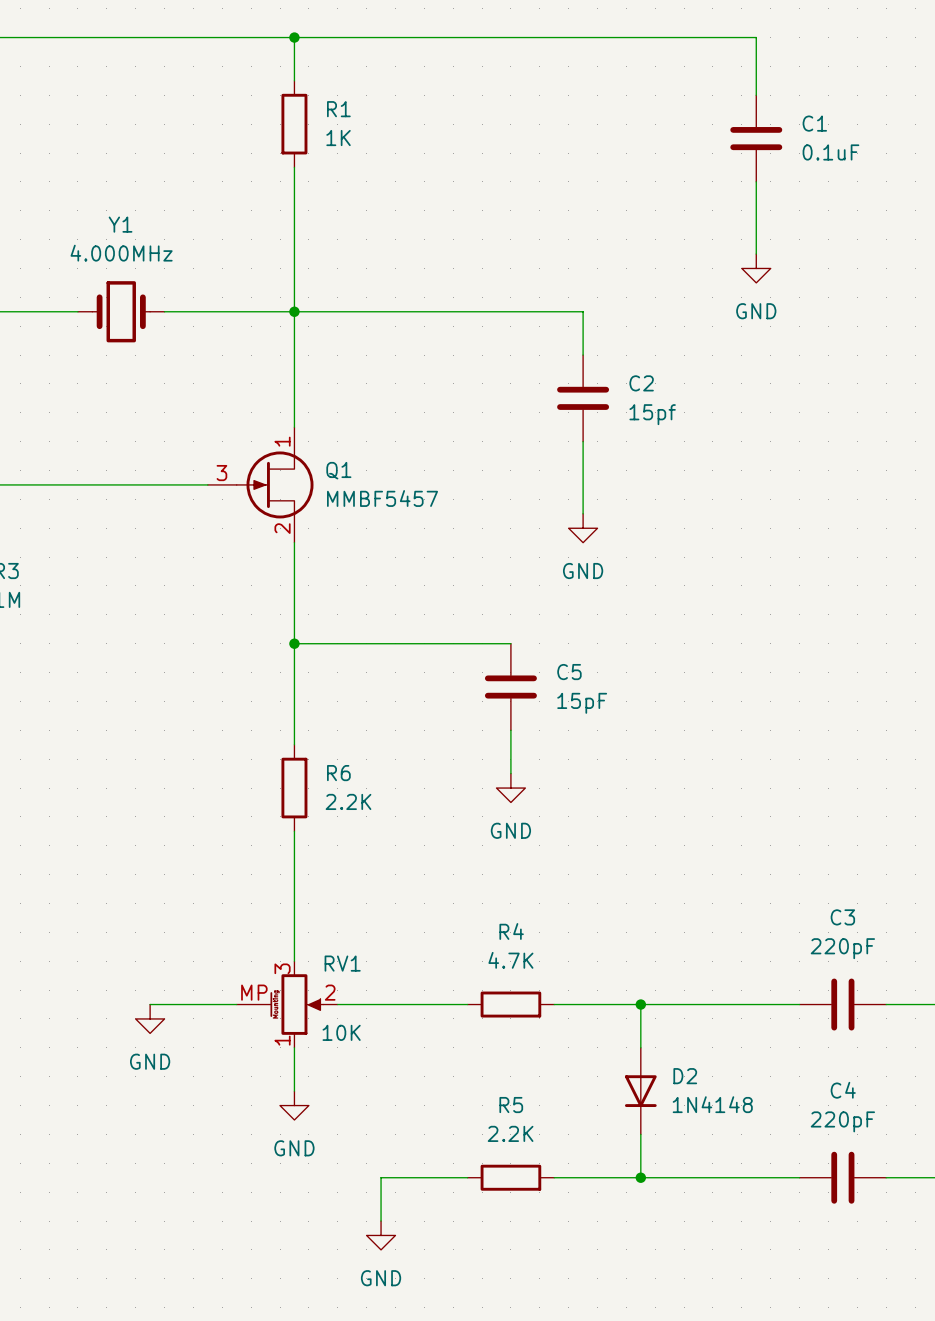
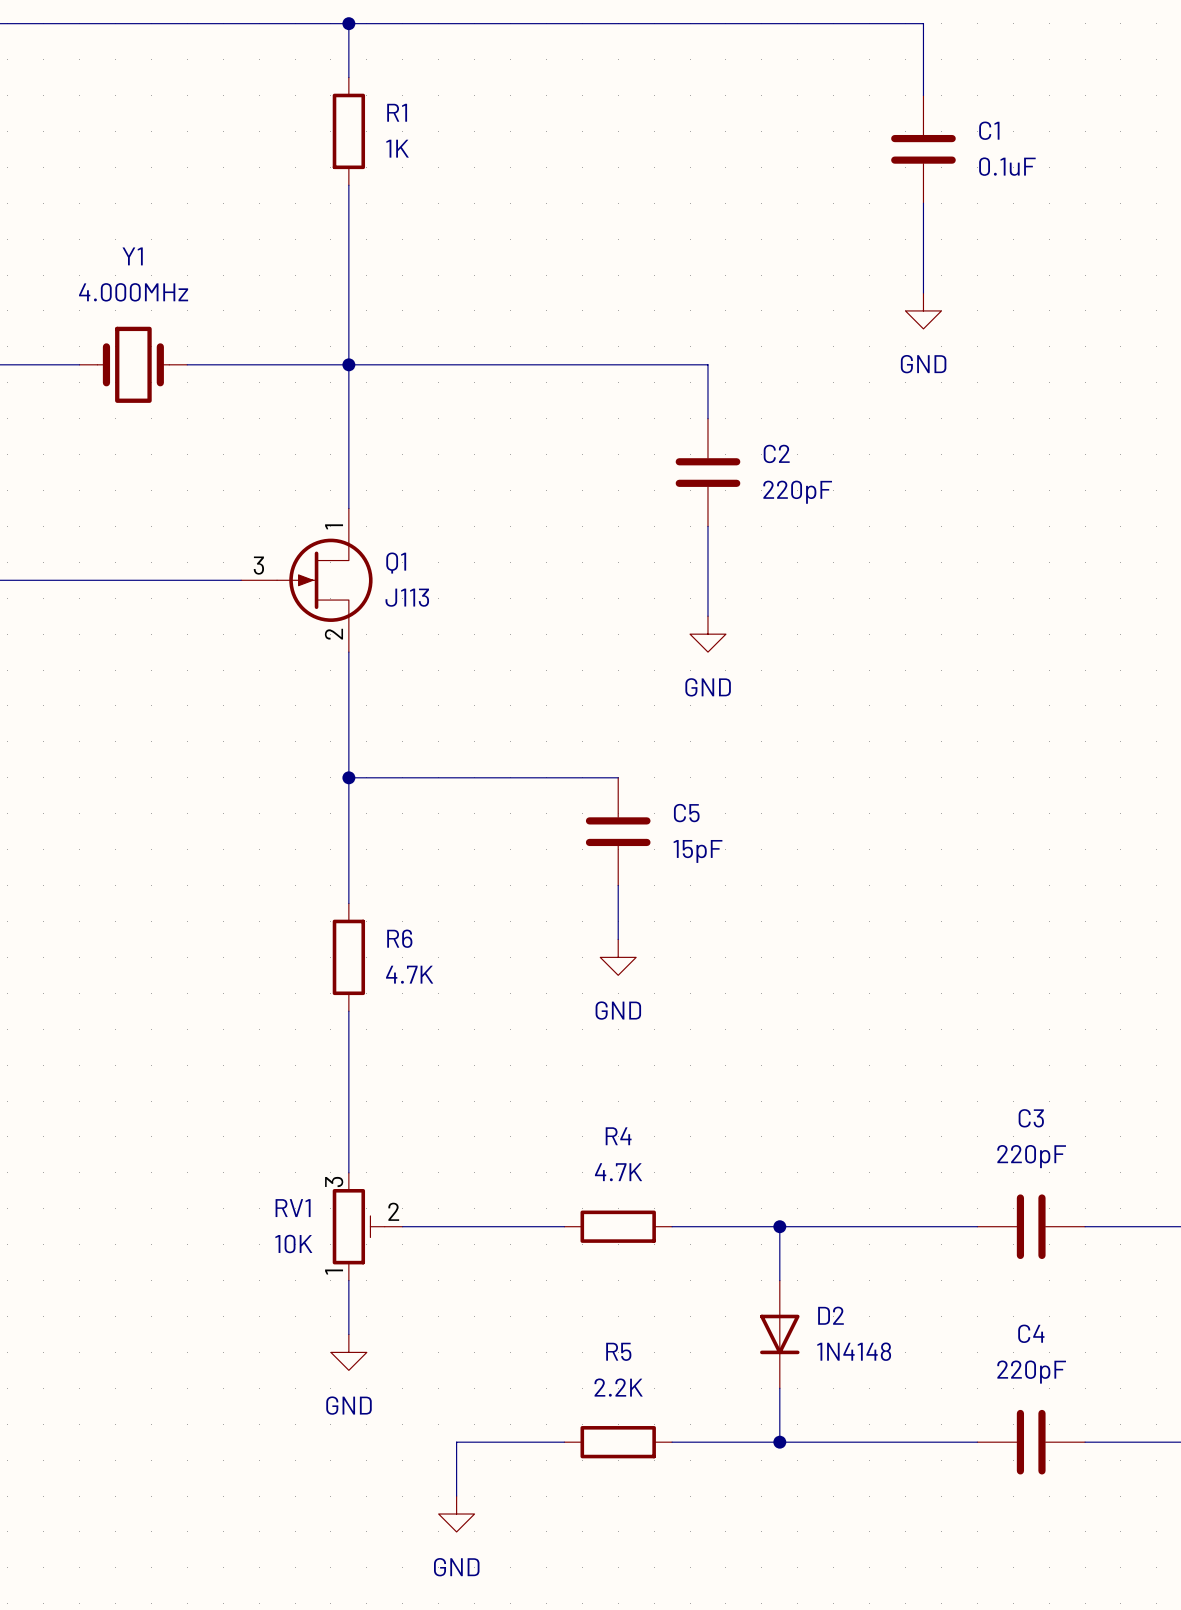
C2 value: 15pf (652, 414) -> 220pF (797, 492)
Q1 value: MMBF5457 (382, 498) -> J113 (407, 597)
R6 value: 2.2K (348, 801) -> 4.7K (409, 974)
RV1 symbol: [236, 961, 338, 1048] -> [332, 1172, 403, 1281]
RV1 name position: RV1 (342, 963) -> RV1 (293, 1208)
wire: (150, 1004) (236, 1004) -> none
power symbol: GND (150, 1018) -> none
RV1 value position: 10K (341, 1032) -> 10K (293, 1244)

